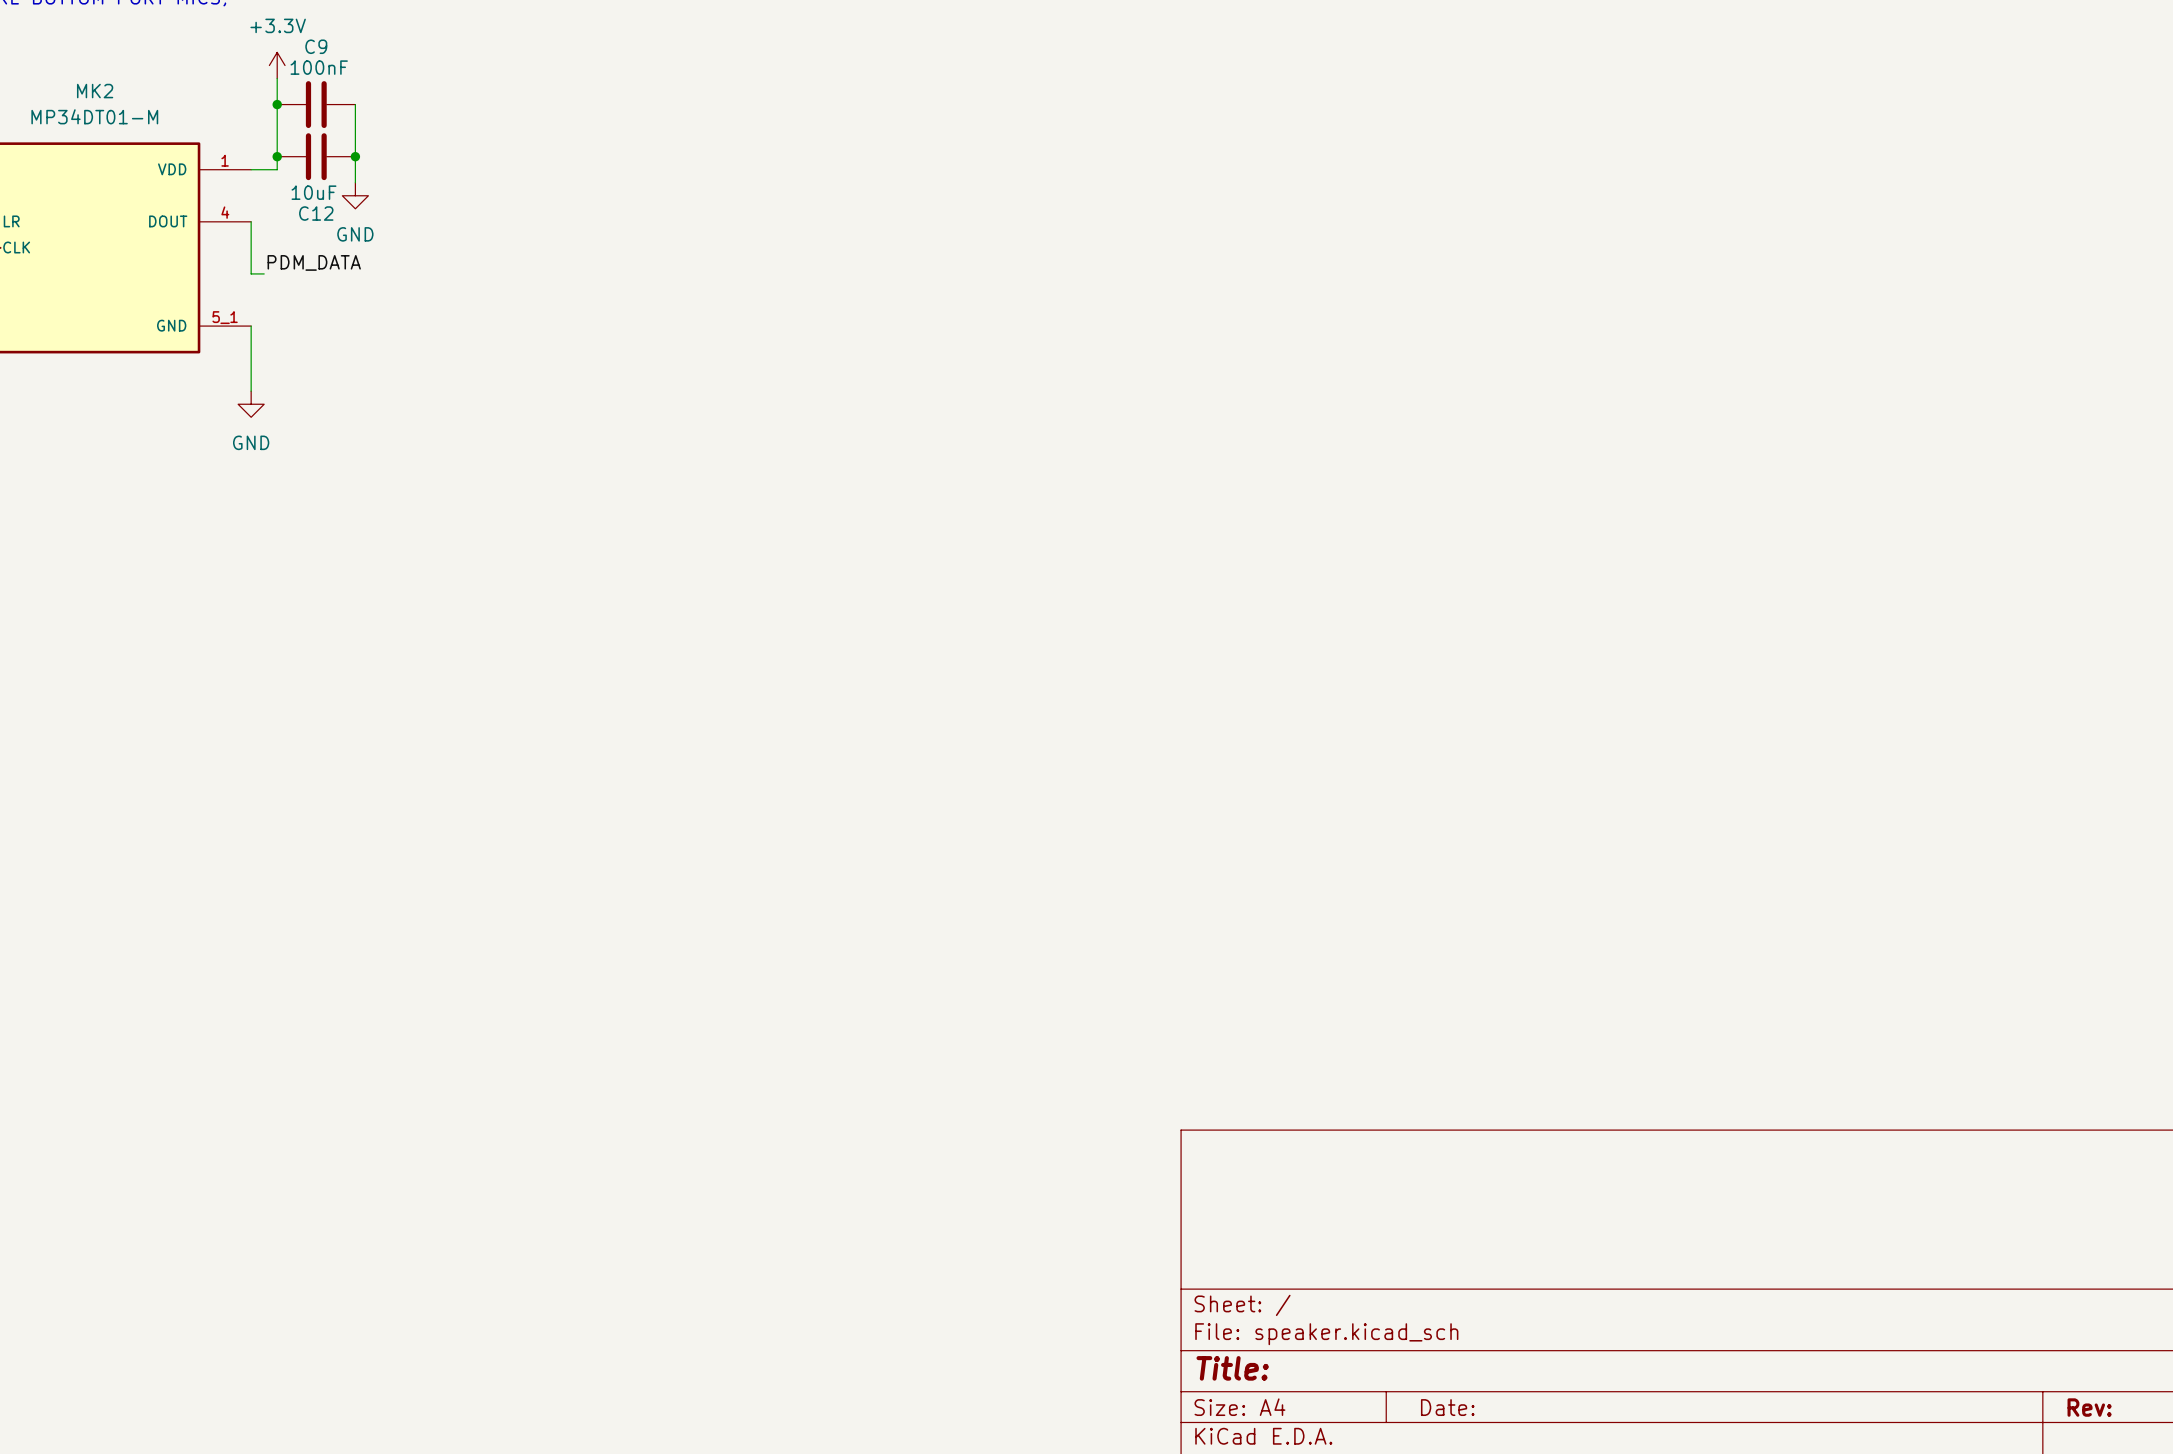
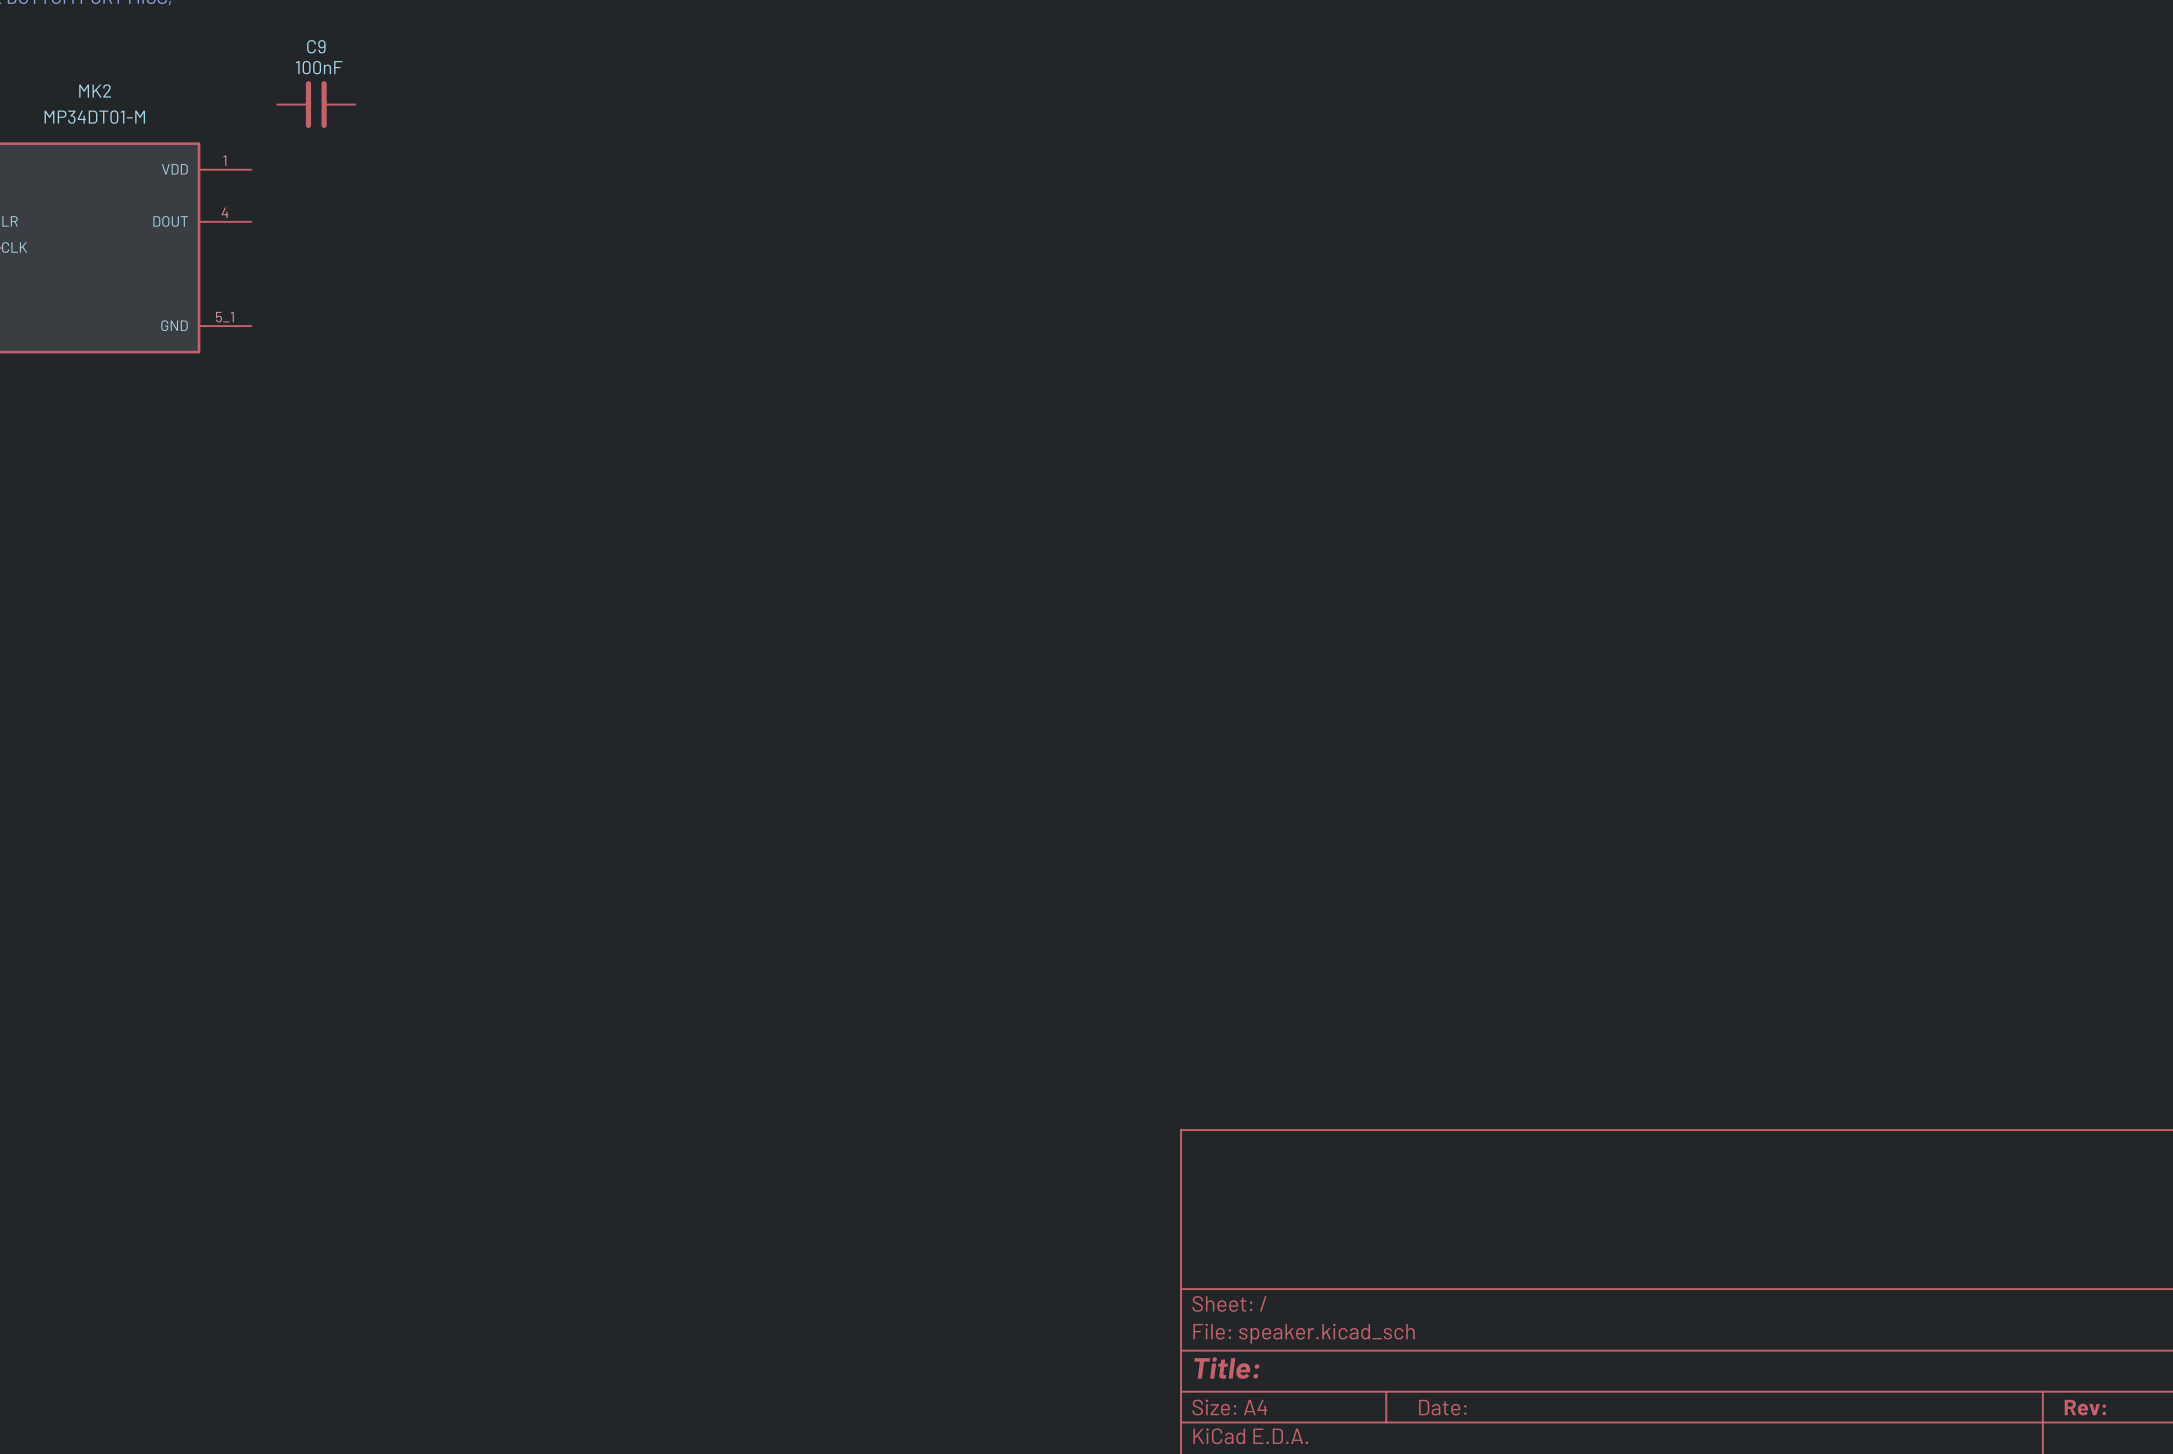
power symbol: +3.3V (277, 65) -> none
wire: (277, 78) (277, 169) (251, 169) -> none
junction: (277, 104) -> none
wire: (355, 104) (355, 182) -> none
junction: (277, 156) -> none
C12: 10uF (316, 156) -> none
junction: (355, 156) -> none
power symbol: GND (355, 195) -> none
wire: (251, 221) (251, 273) (264, 273) -> none
label: PDM_DATA (314, 262) -> none
wire: (251, 326) (251, 391) -> none
power symbol: GND (251, 404) -> none

